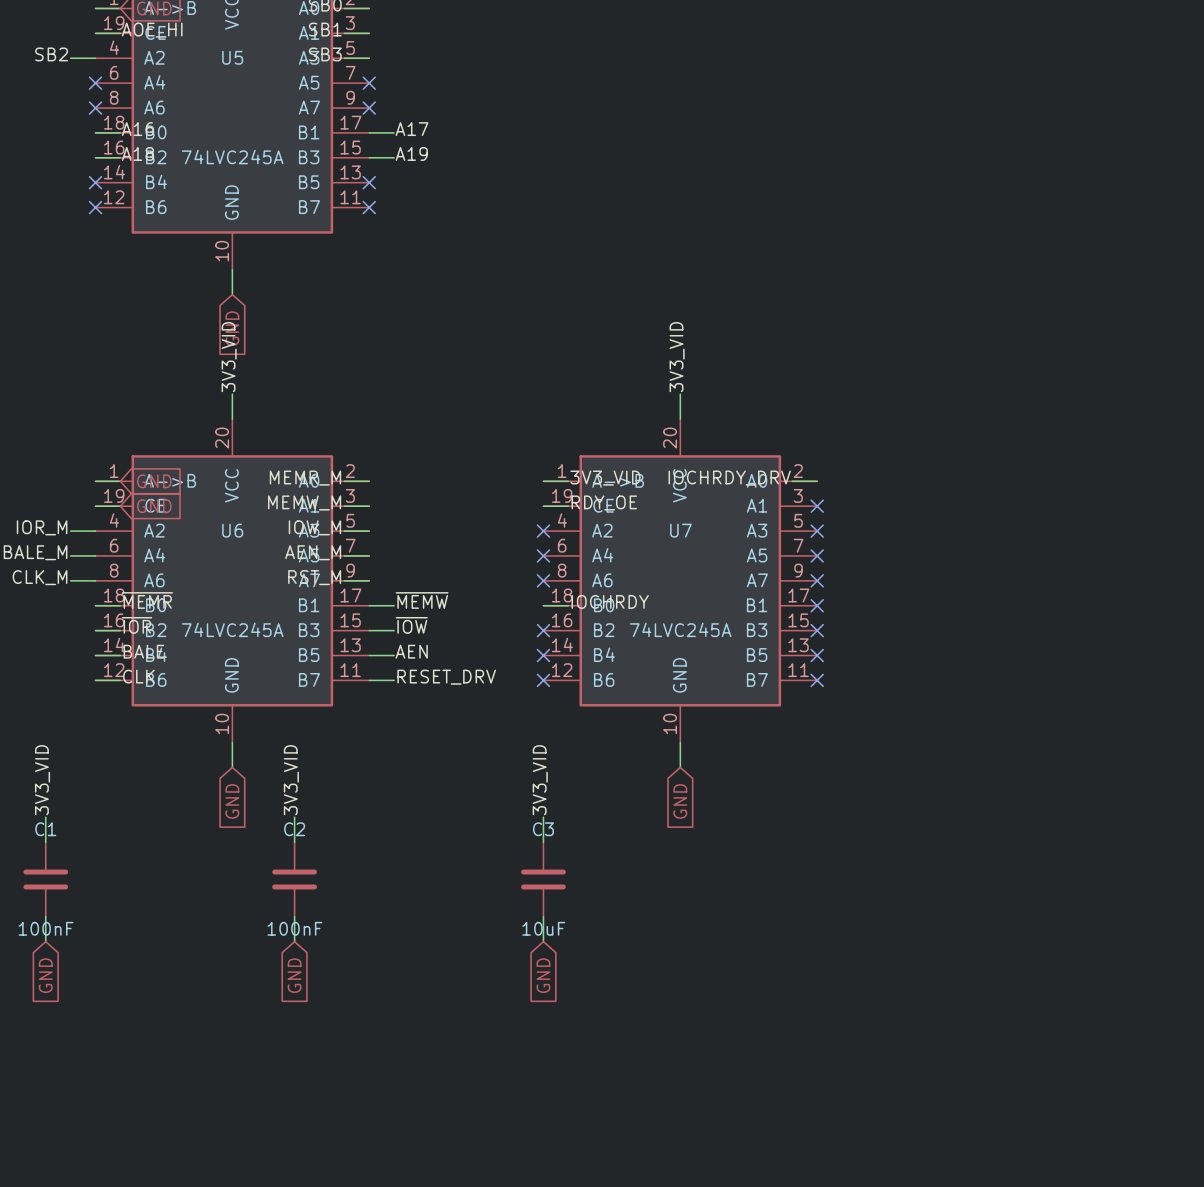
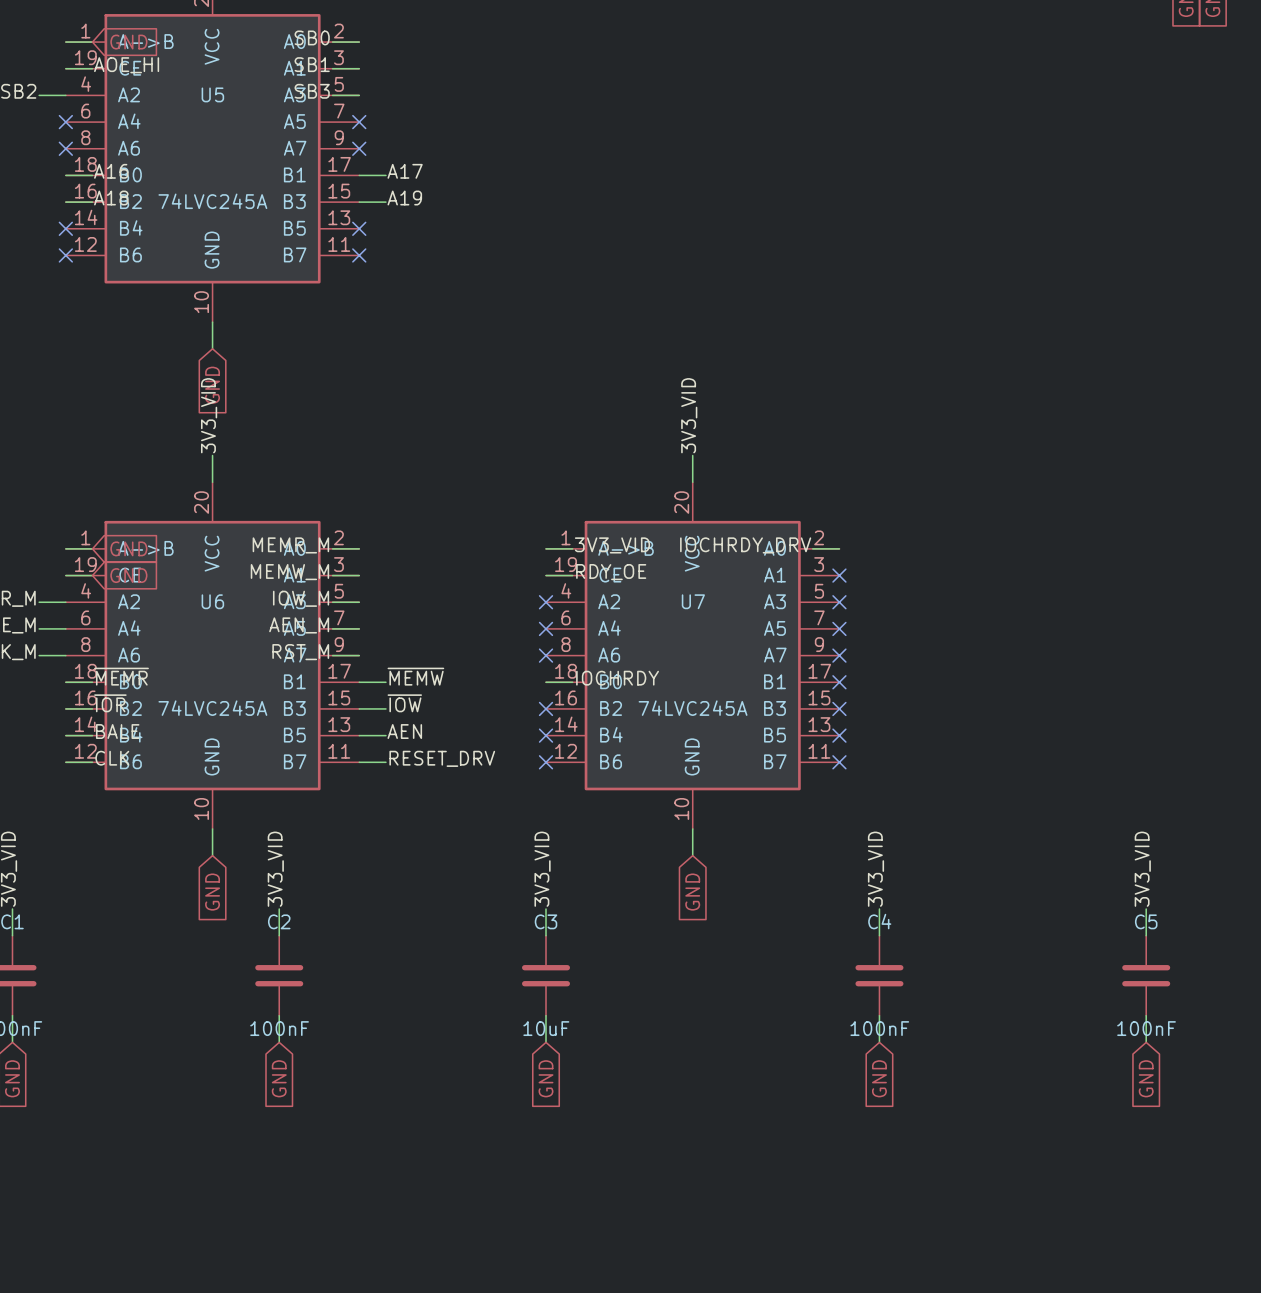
label: none -> 3V3_VID (875, 869)
label: none -> 3V3_VID (1142, 869)
wire: none -> (879, 909) (879, 935)
wire: none -> (1146, 909) (1146, 935)
C4: none -> 100nF (879, 975)
C5: none -> 100nF (1146, 975)
wire: none -> (879, 1015) (879, 1042)
wire: none -> (1146, 1015) (1146, 1042)
global label: none -> GND (879, 1078)
global label: none -> GND (1146, 1078)

